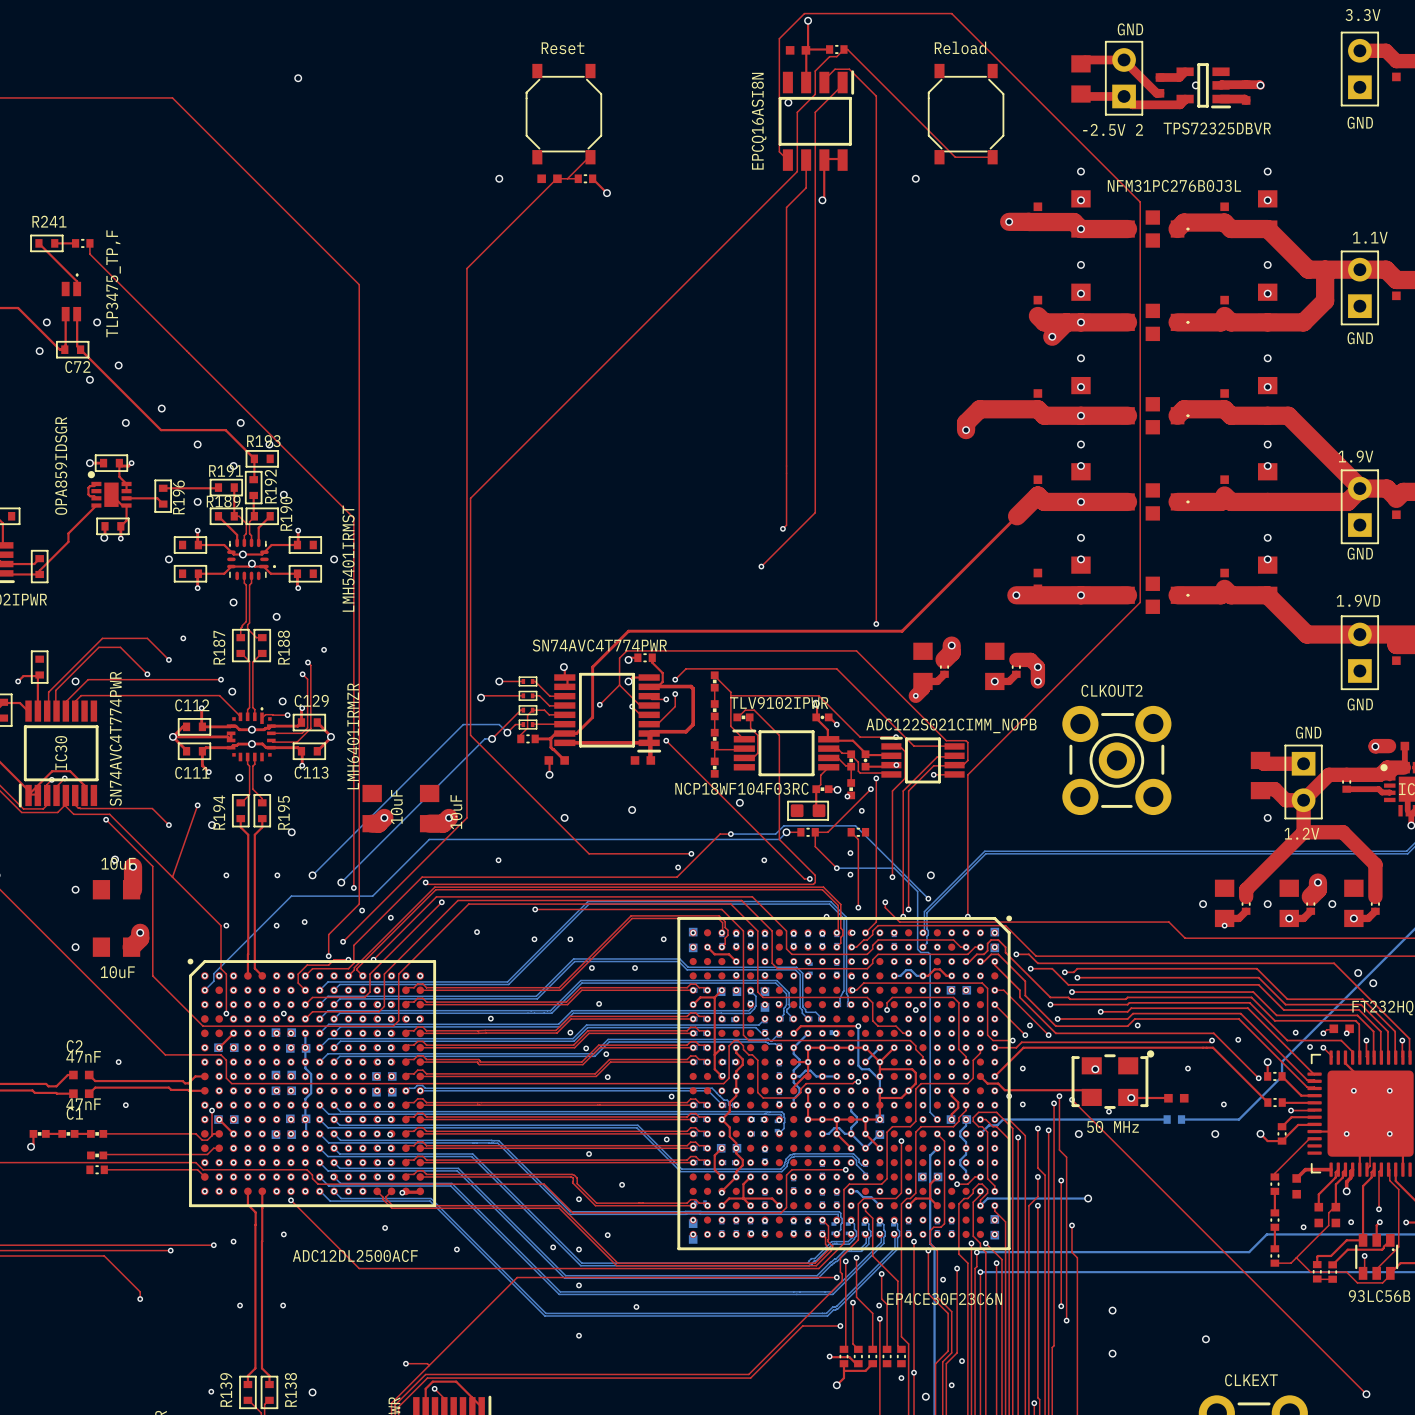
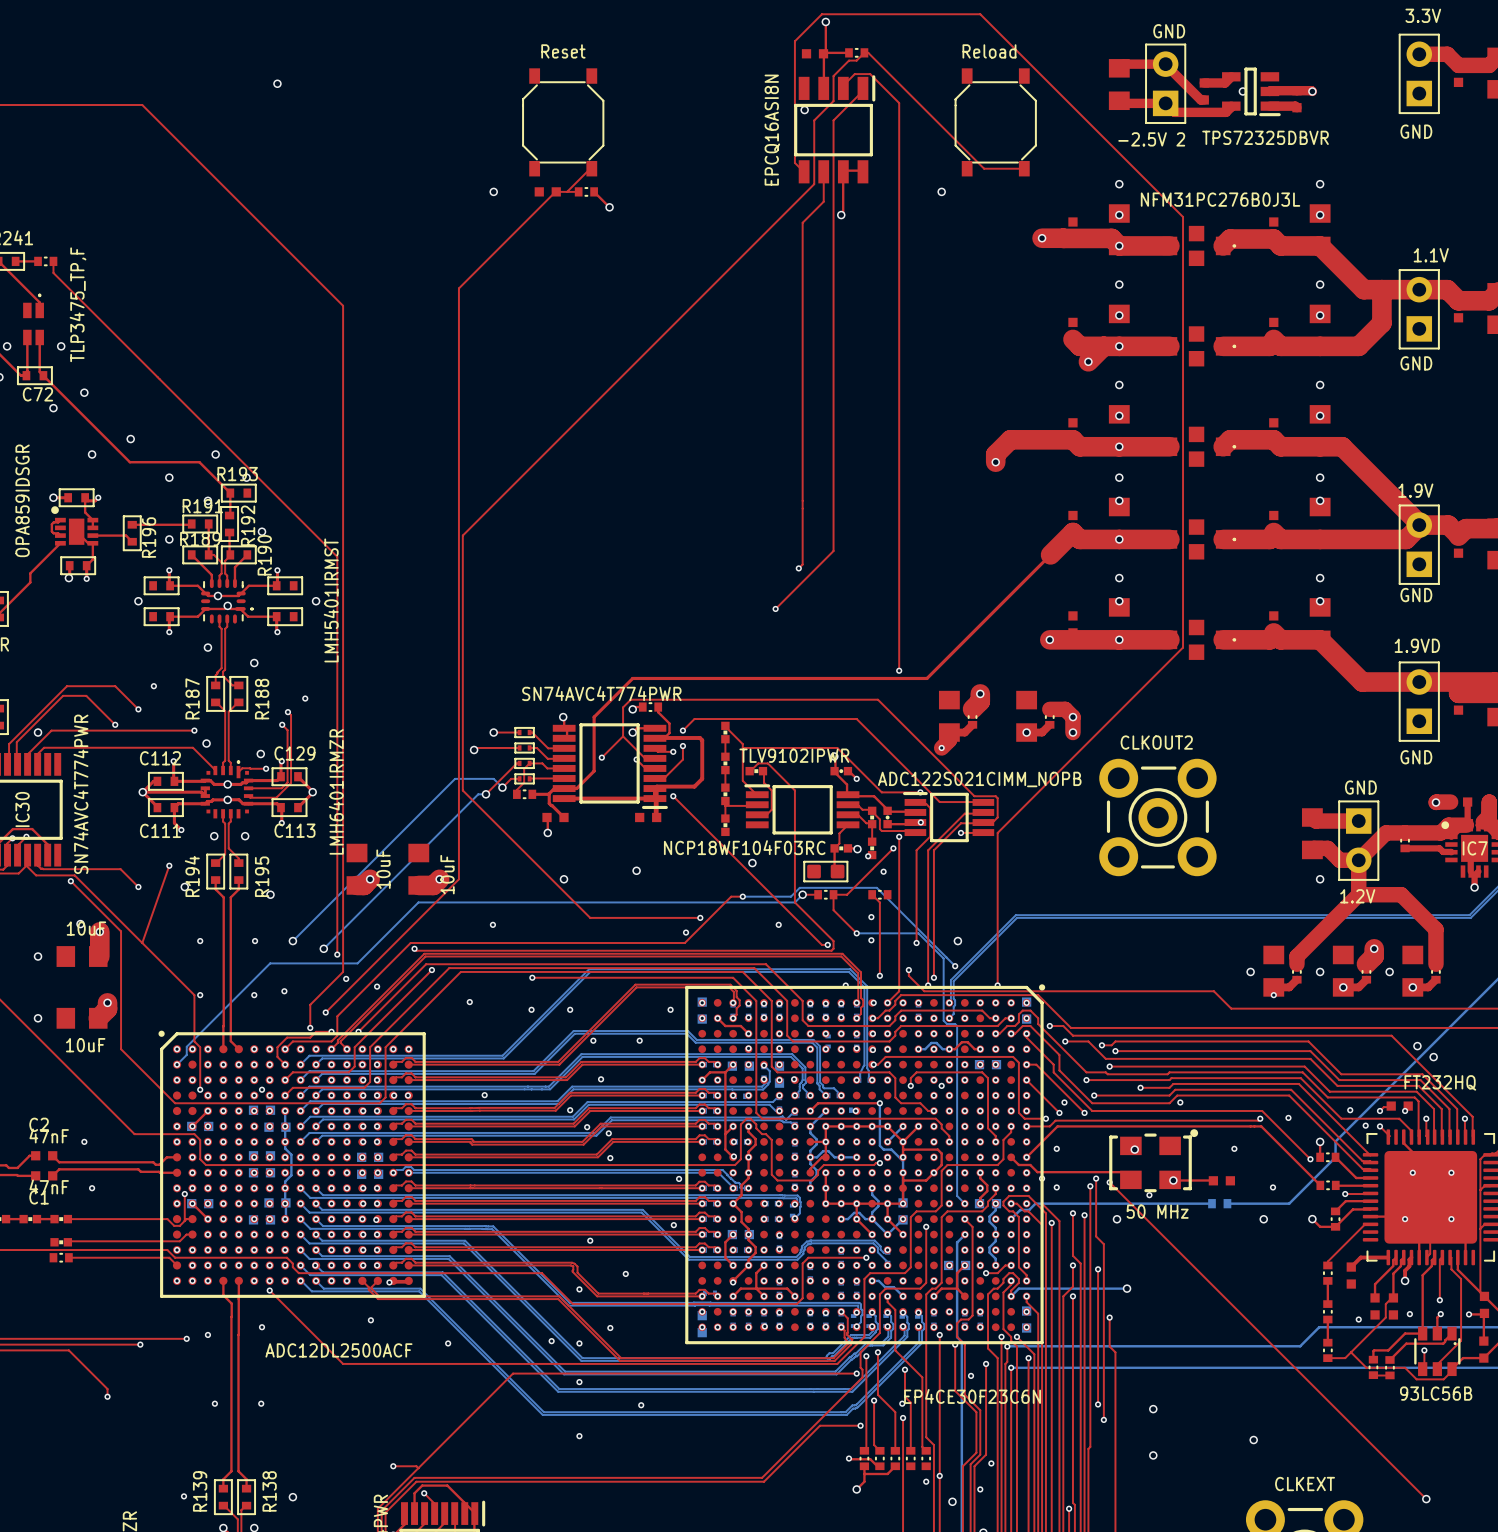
via: none -> (1026, 1049)

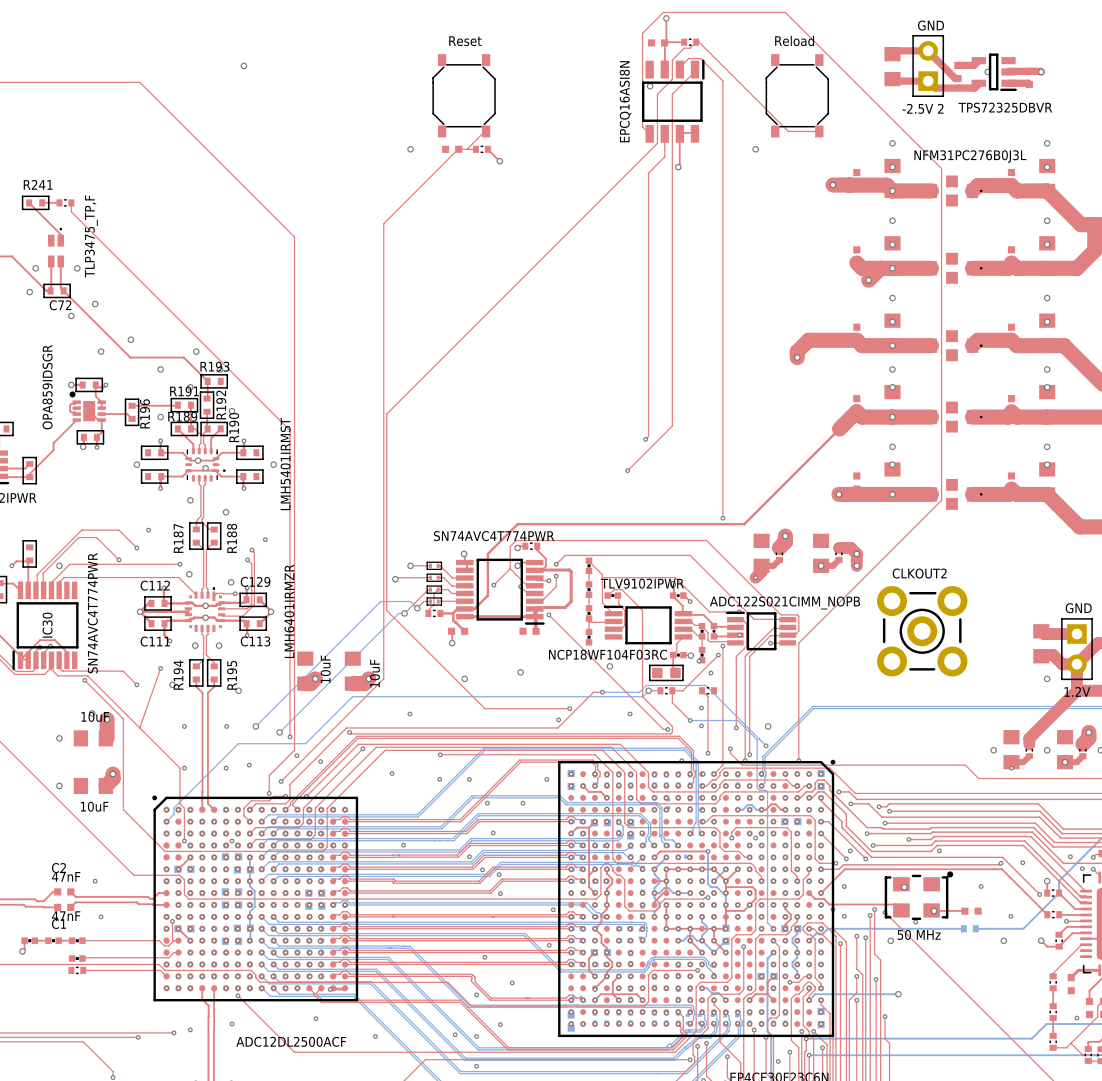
via: none -> (809, 881)
via: none -> (571, 893)
via: none -> (583, 893)
via: none -> (642, 1012)
via: none -> (642, 1023)

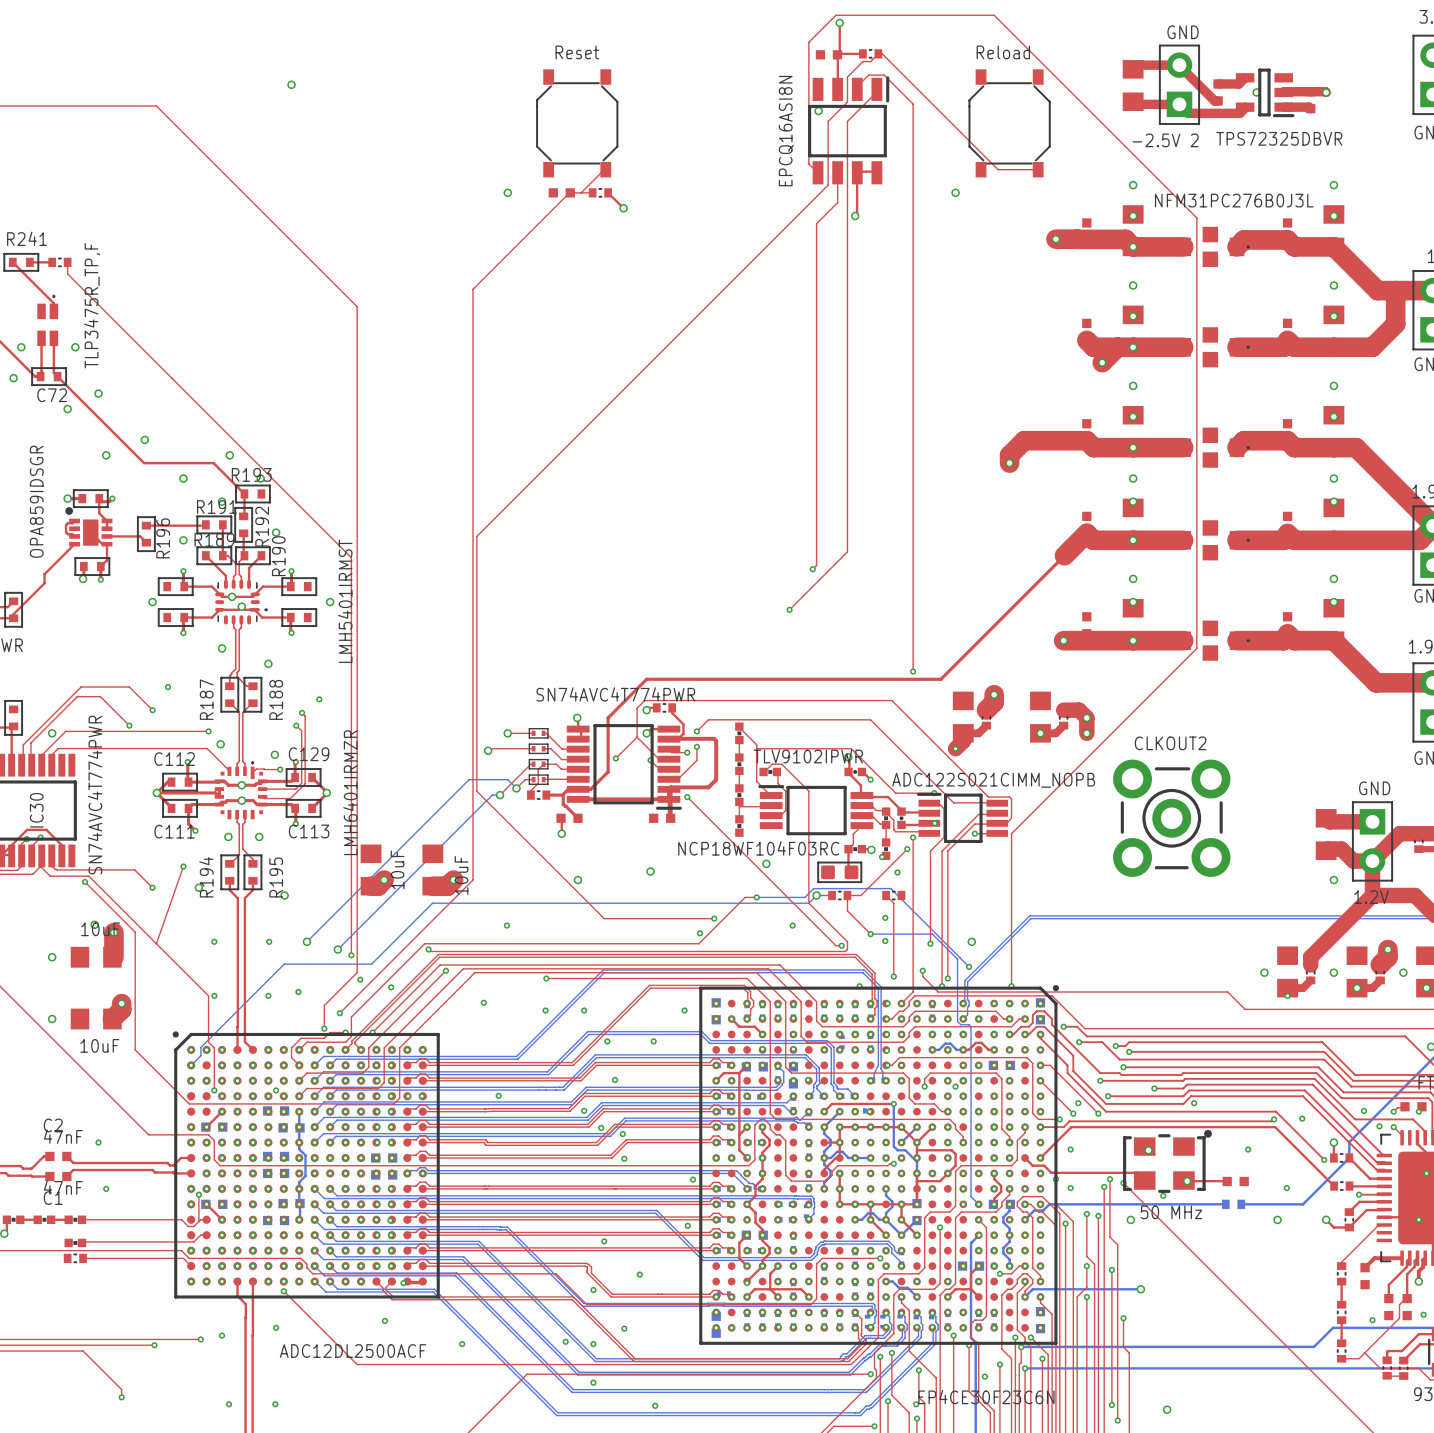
part value: TLP3475_TP,F (91, 236) -> TLP3475R_TP,F (92, 305)

